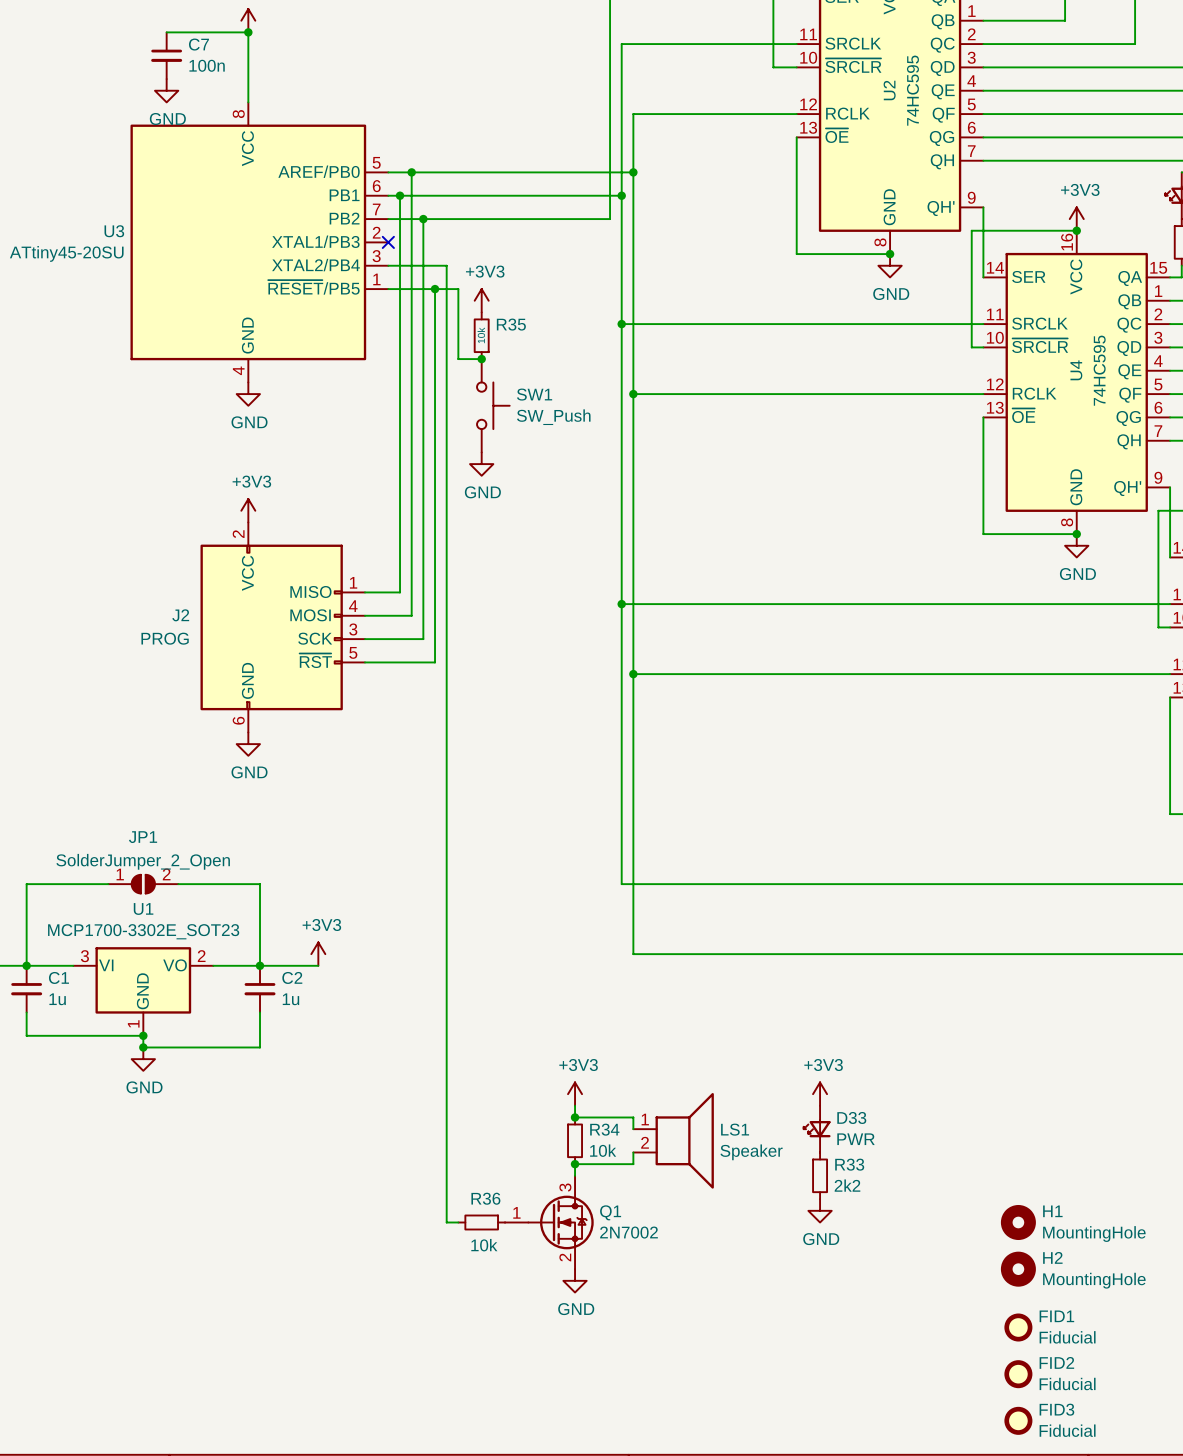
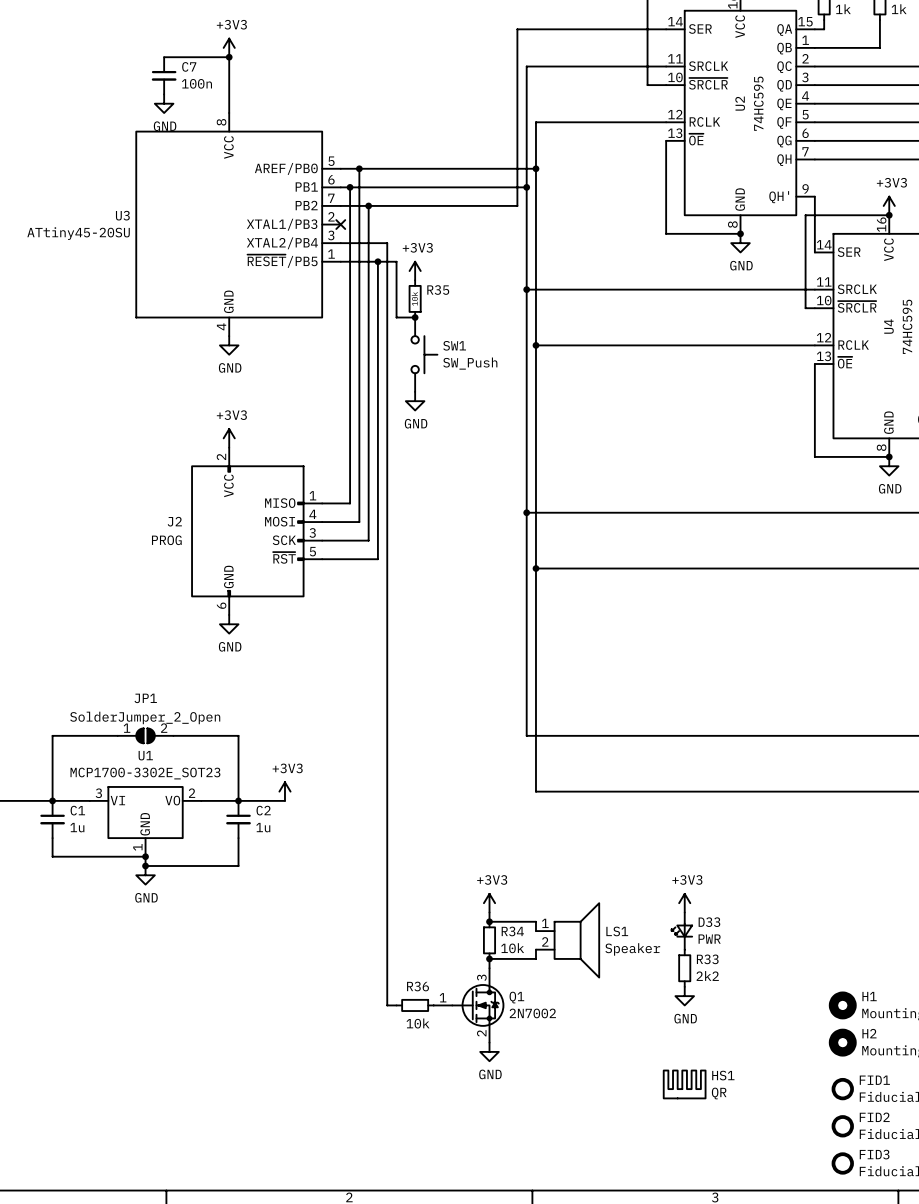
HS1: none -> QR (684, 1084)

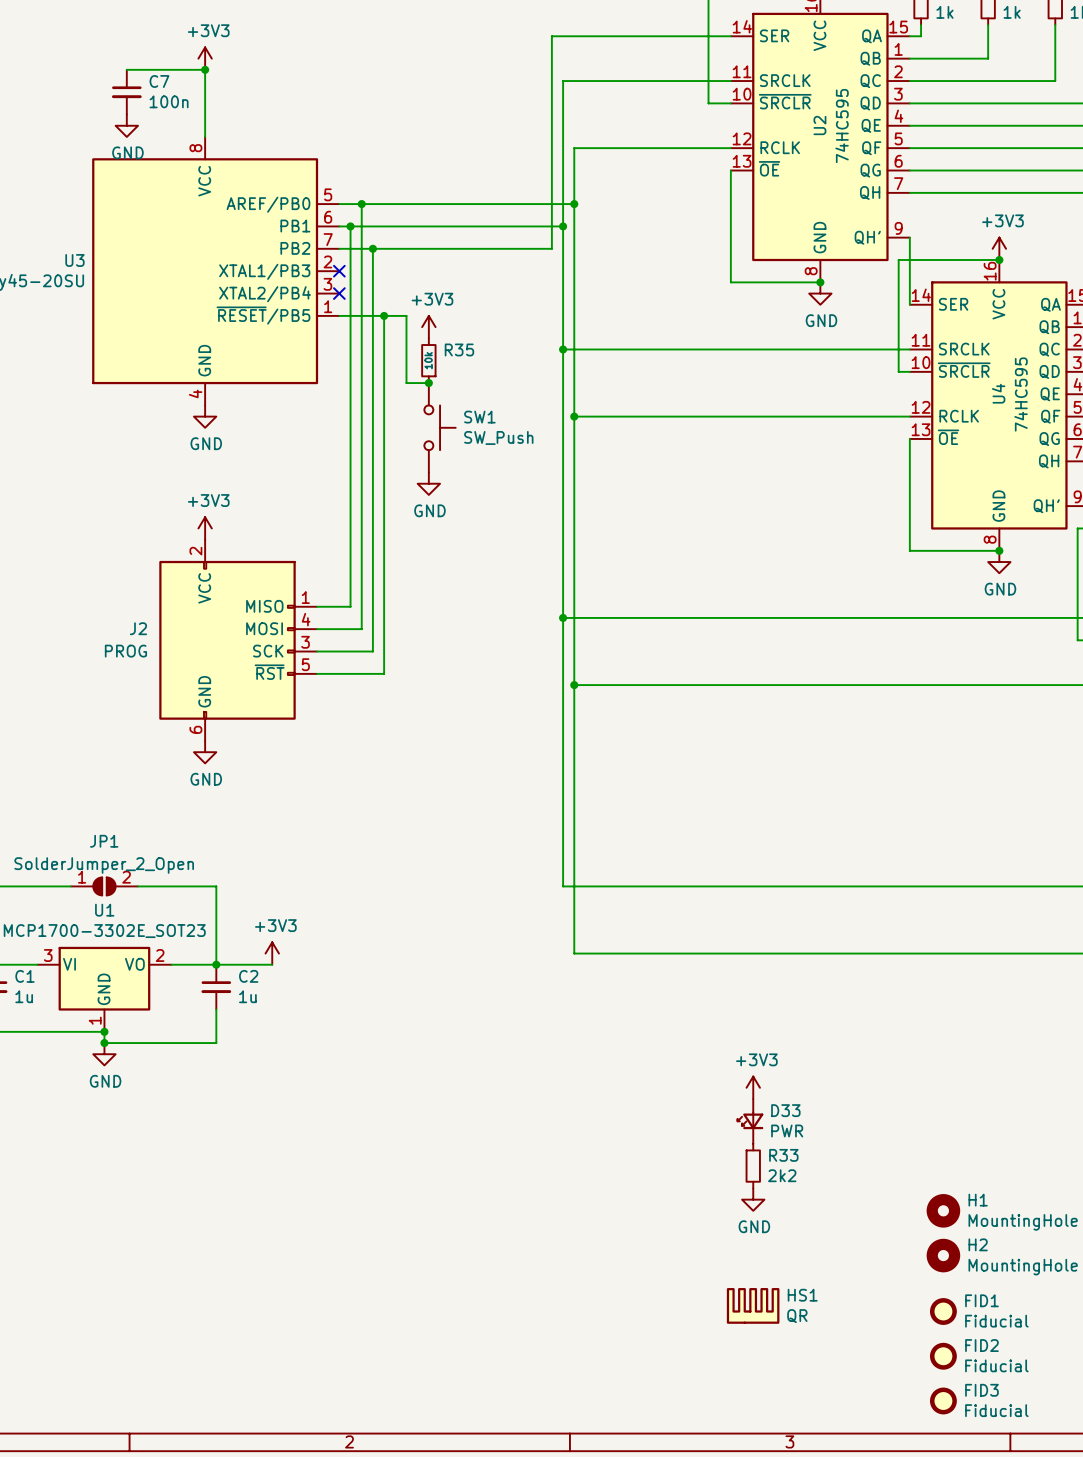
wire: (340, 243) (387, 243) (387, 1005) (396, 1005) -> none
no-connect mark: none -> (339, 293)
power symbol: +3V3 (489, 903) -> none
wire: (489, 912) (489, 921) (535, 921) (535, 931) -> none
junction: (489, 921) -> none
R34: 10k (489, 940) -> none
LS1: Speaker (568, 940) -> none
wire: (535, 949) (535, 958) (489, 958) (489, 968) -> none
junction: (489, 958) -> none
R36: 10k (415, 1005) -> none
Q1: 2N7002 (469, 1005) -> none
power symbol: GND (489, 1051) -> none

